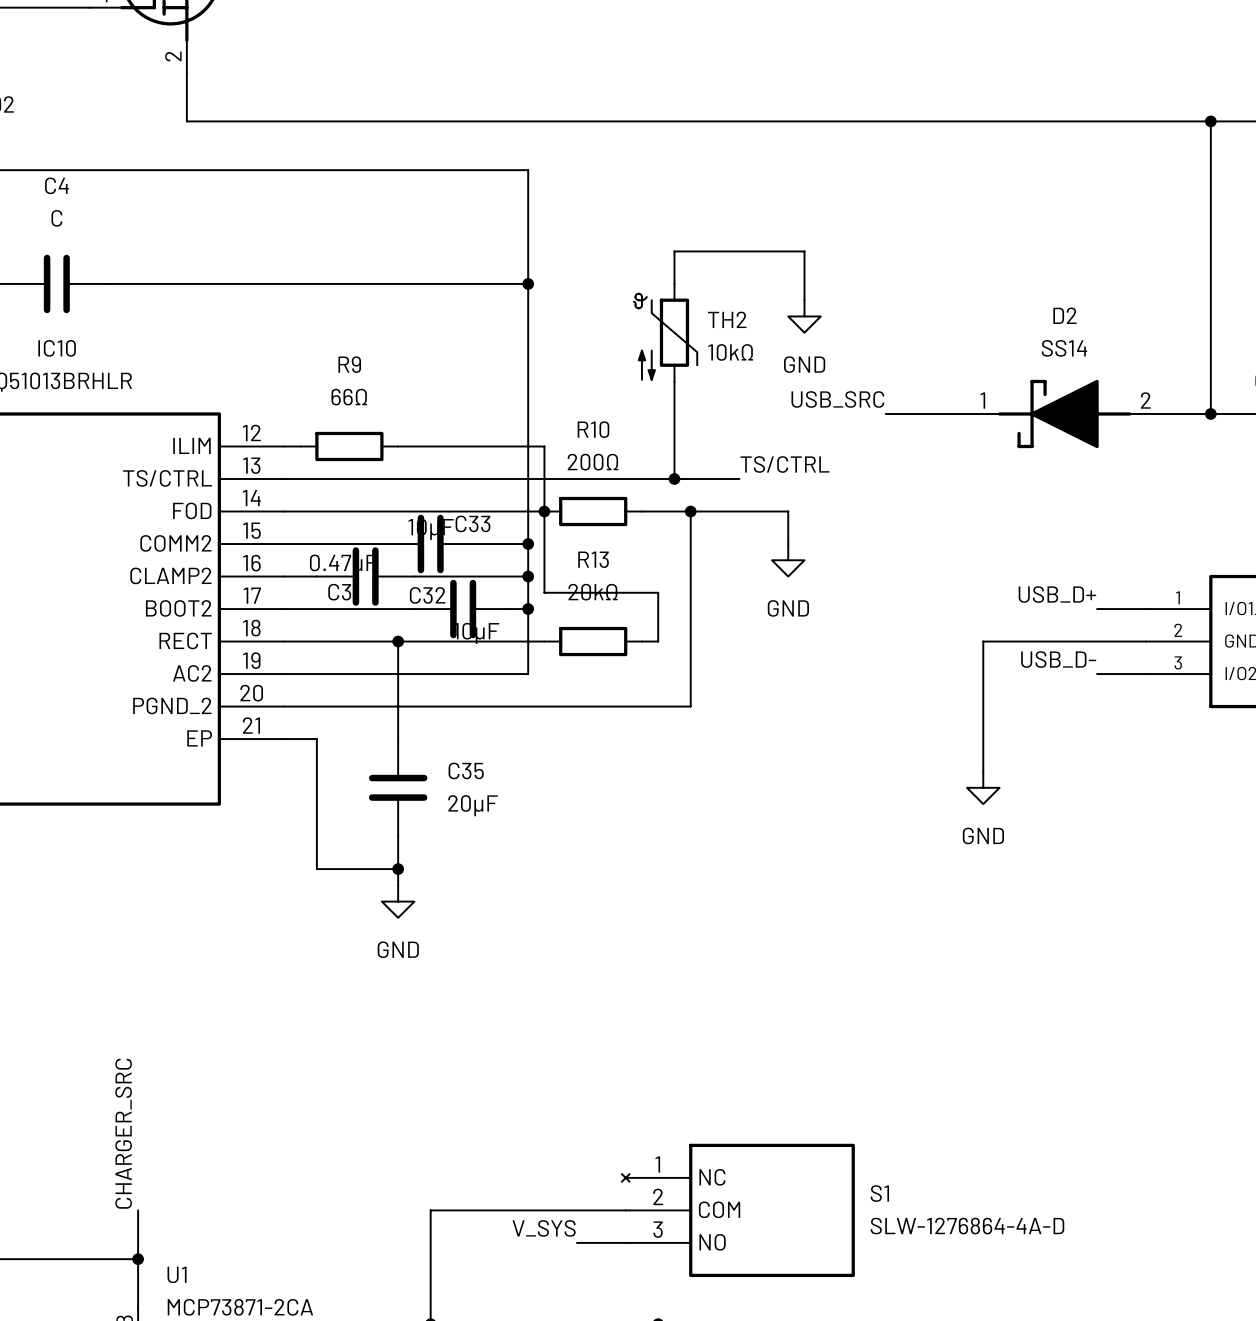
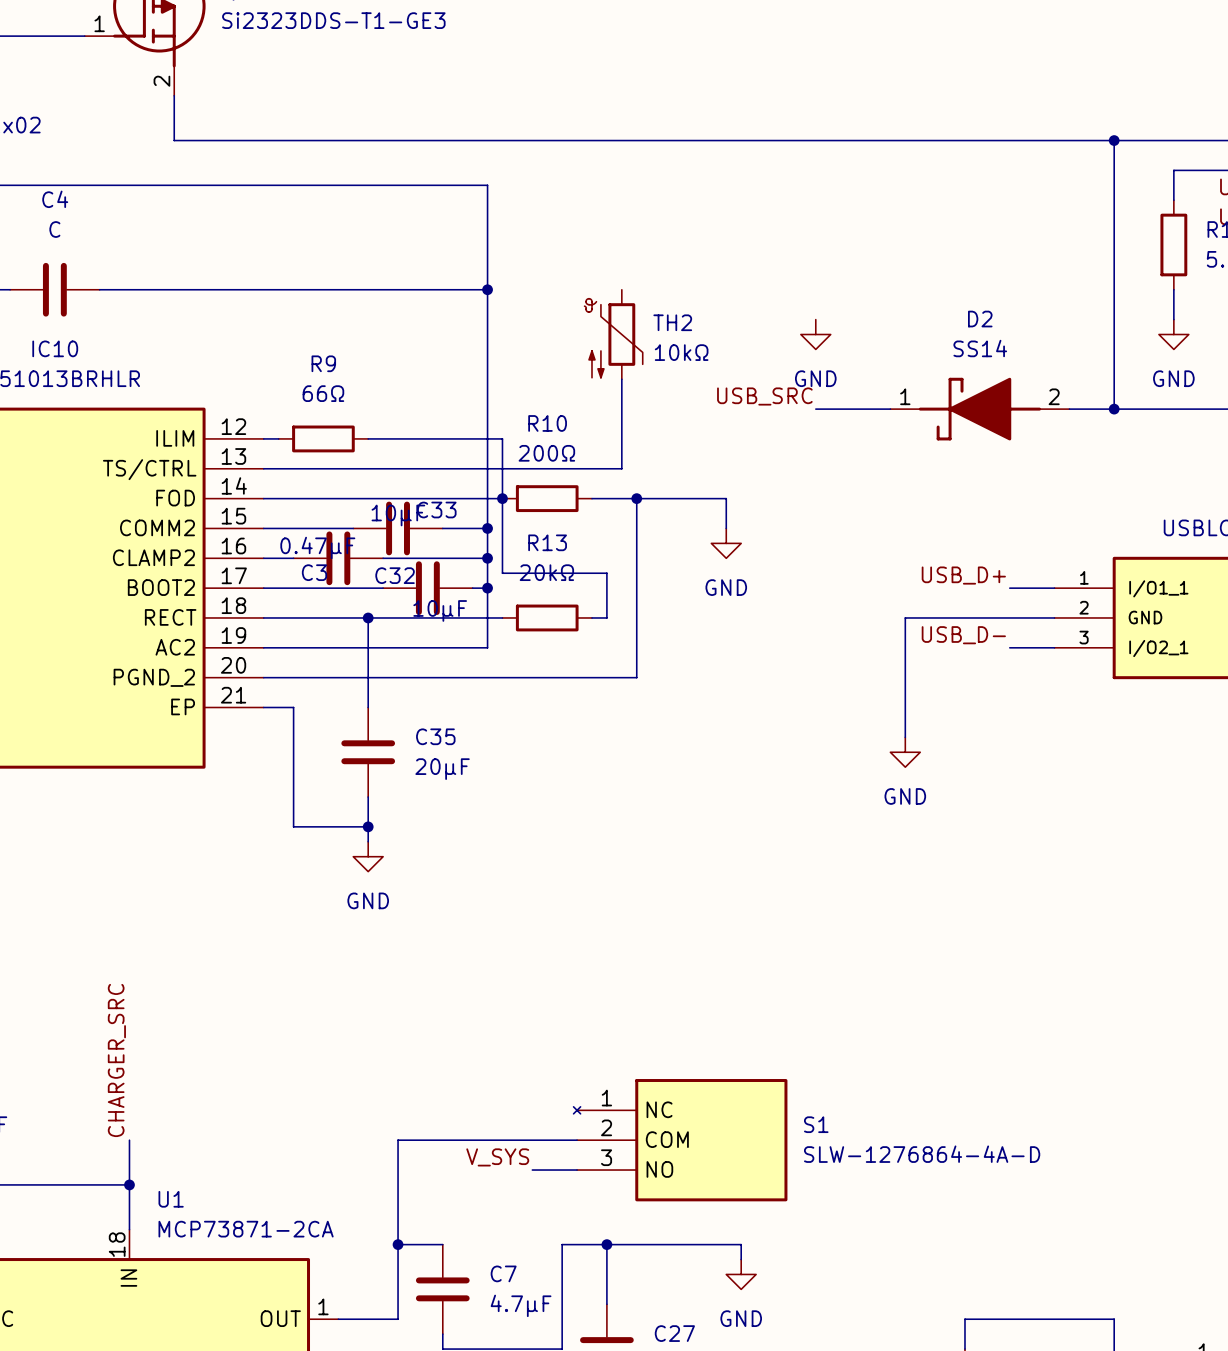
wire: (674, 283) (674, 251) (804, 251) (804, 300) -> none
power symbol position: GND (804, 316) -> GND (815, 334)
label: TS/CTRL (784, 464) -> none
wire: (674, 479) (739, 479) -> none
junction: (674, 479) -> none

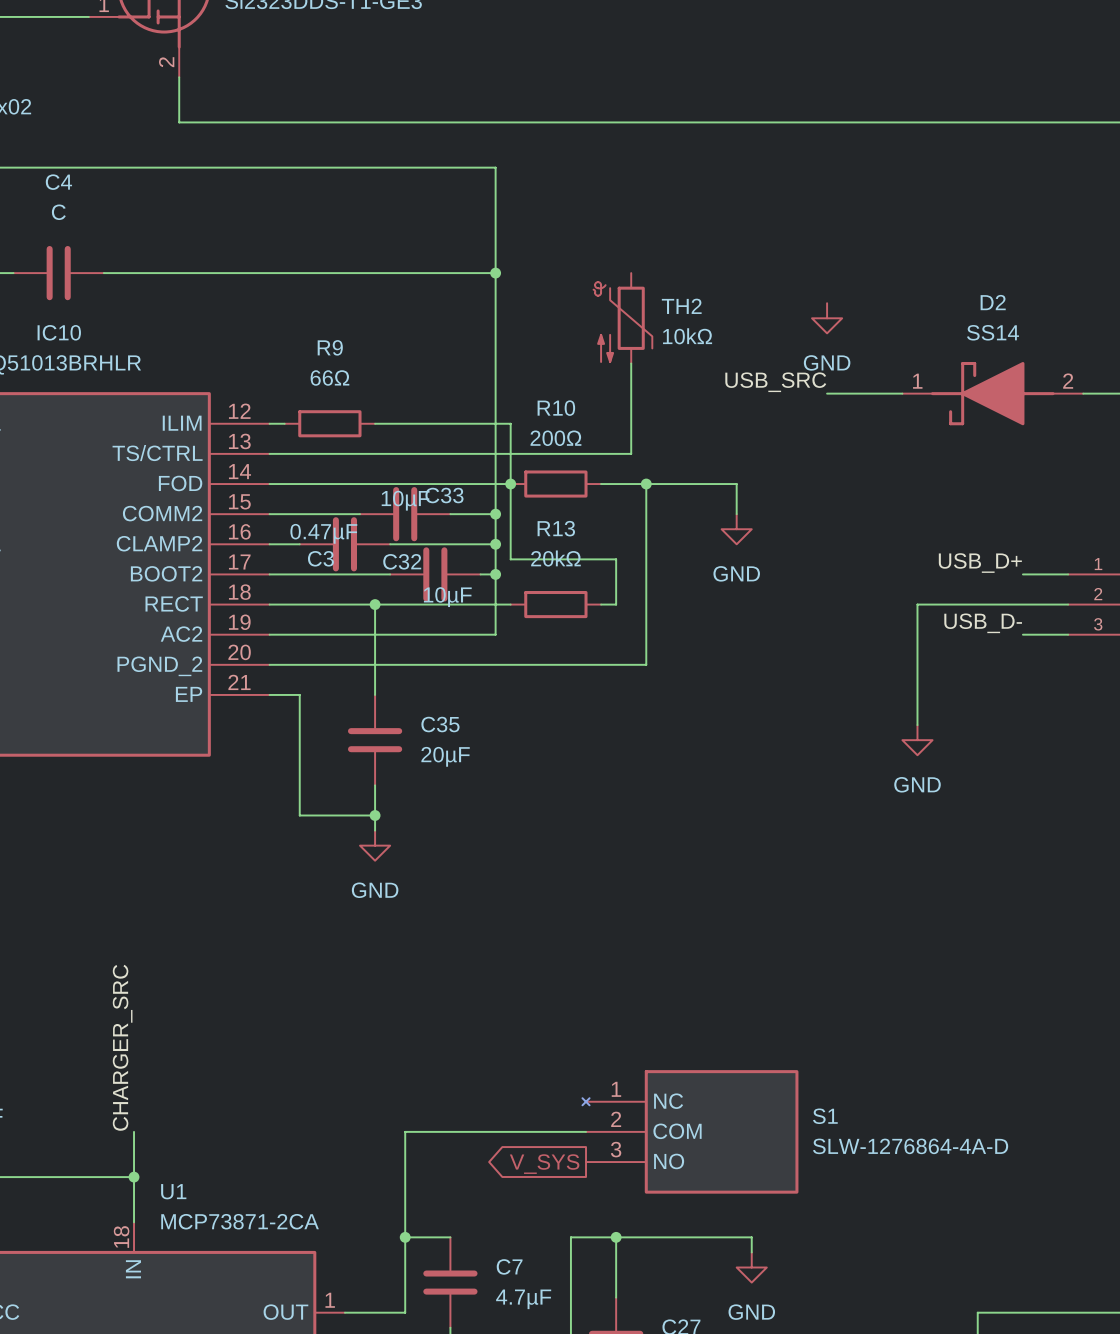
label: V_SYS (497, 1157) -> none
wire: (532, 1170) (577, 1170) -> none
global label: none -> V_SYS (544, 1164)

